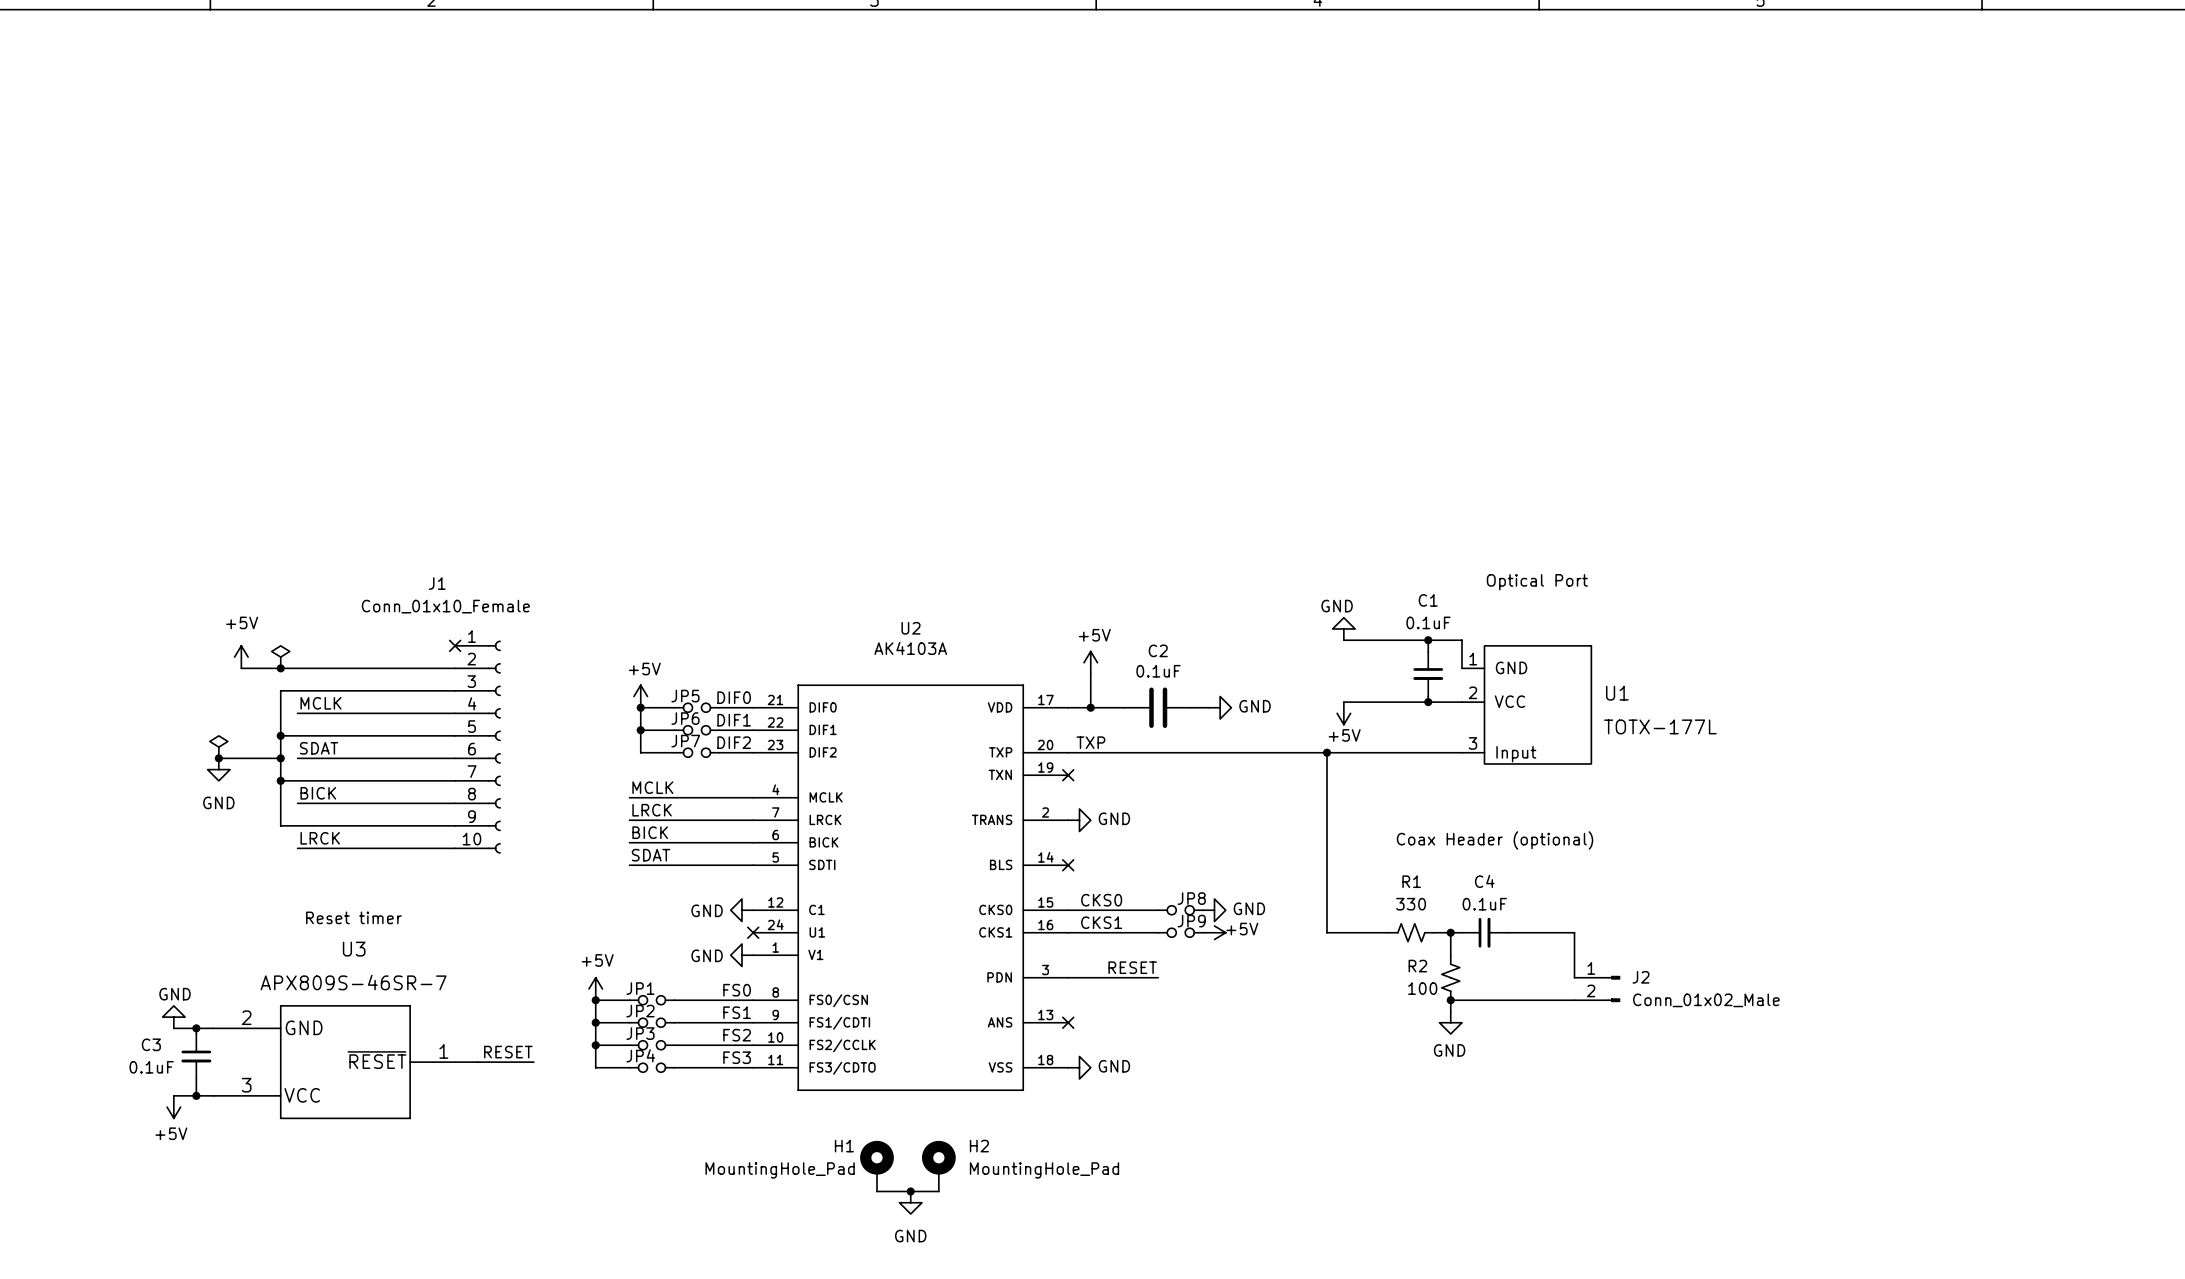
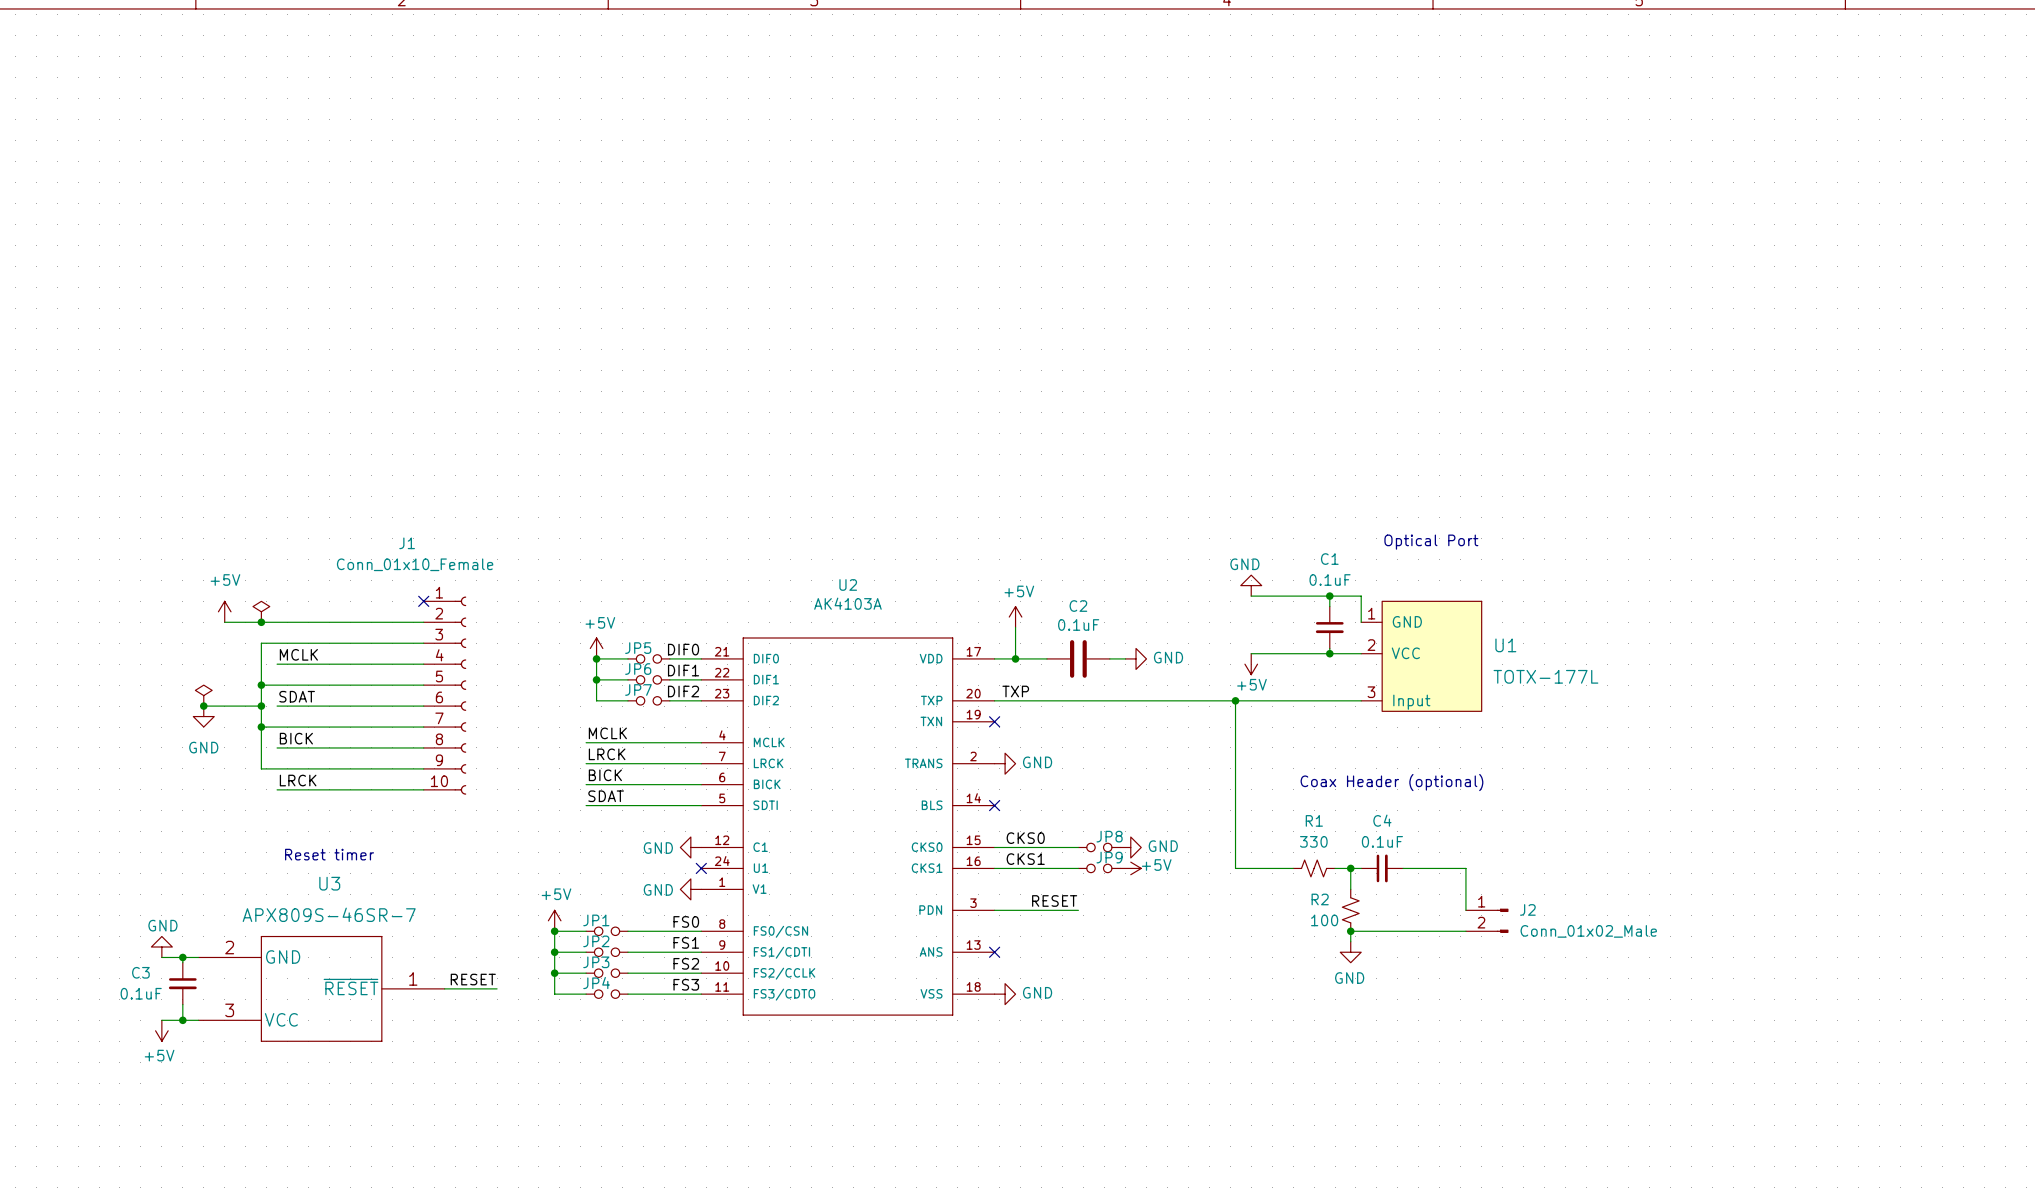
H1: MountingHole_Pad (876, 1166) -> none
H2: MountingHole_Pad (938, 1166) -> none
wire: (876, 1191) (938, 1191) -> none
junction: (910, 1191) -> none
power symbol: GND (910, 1202) -> none

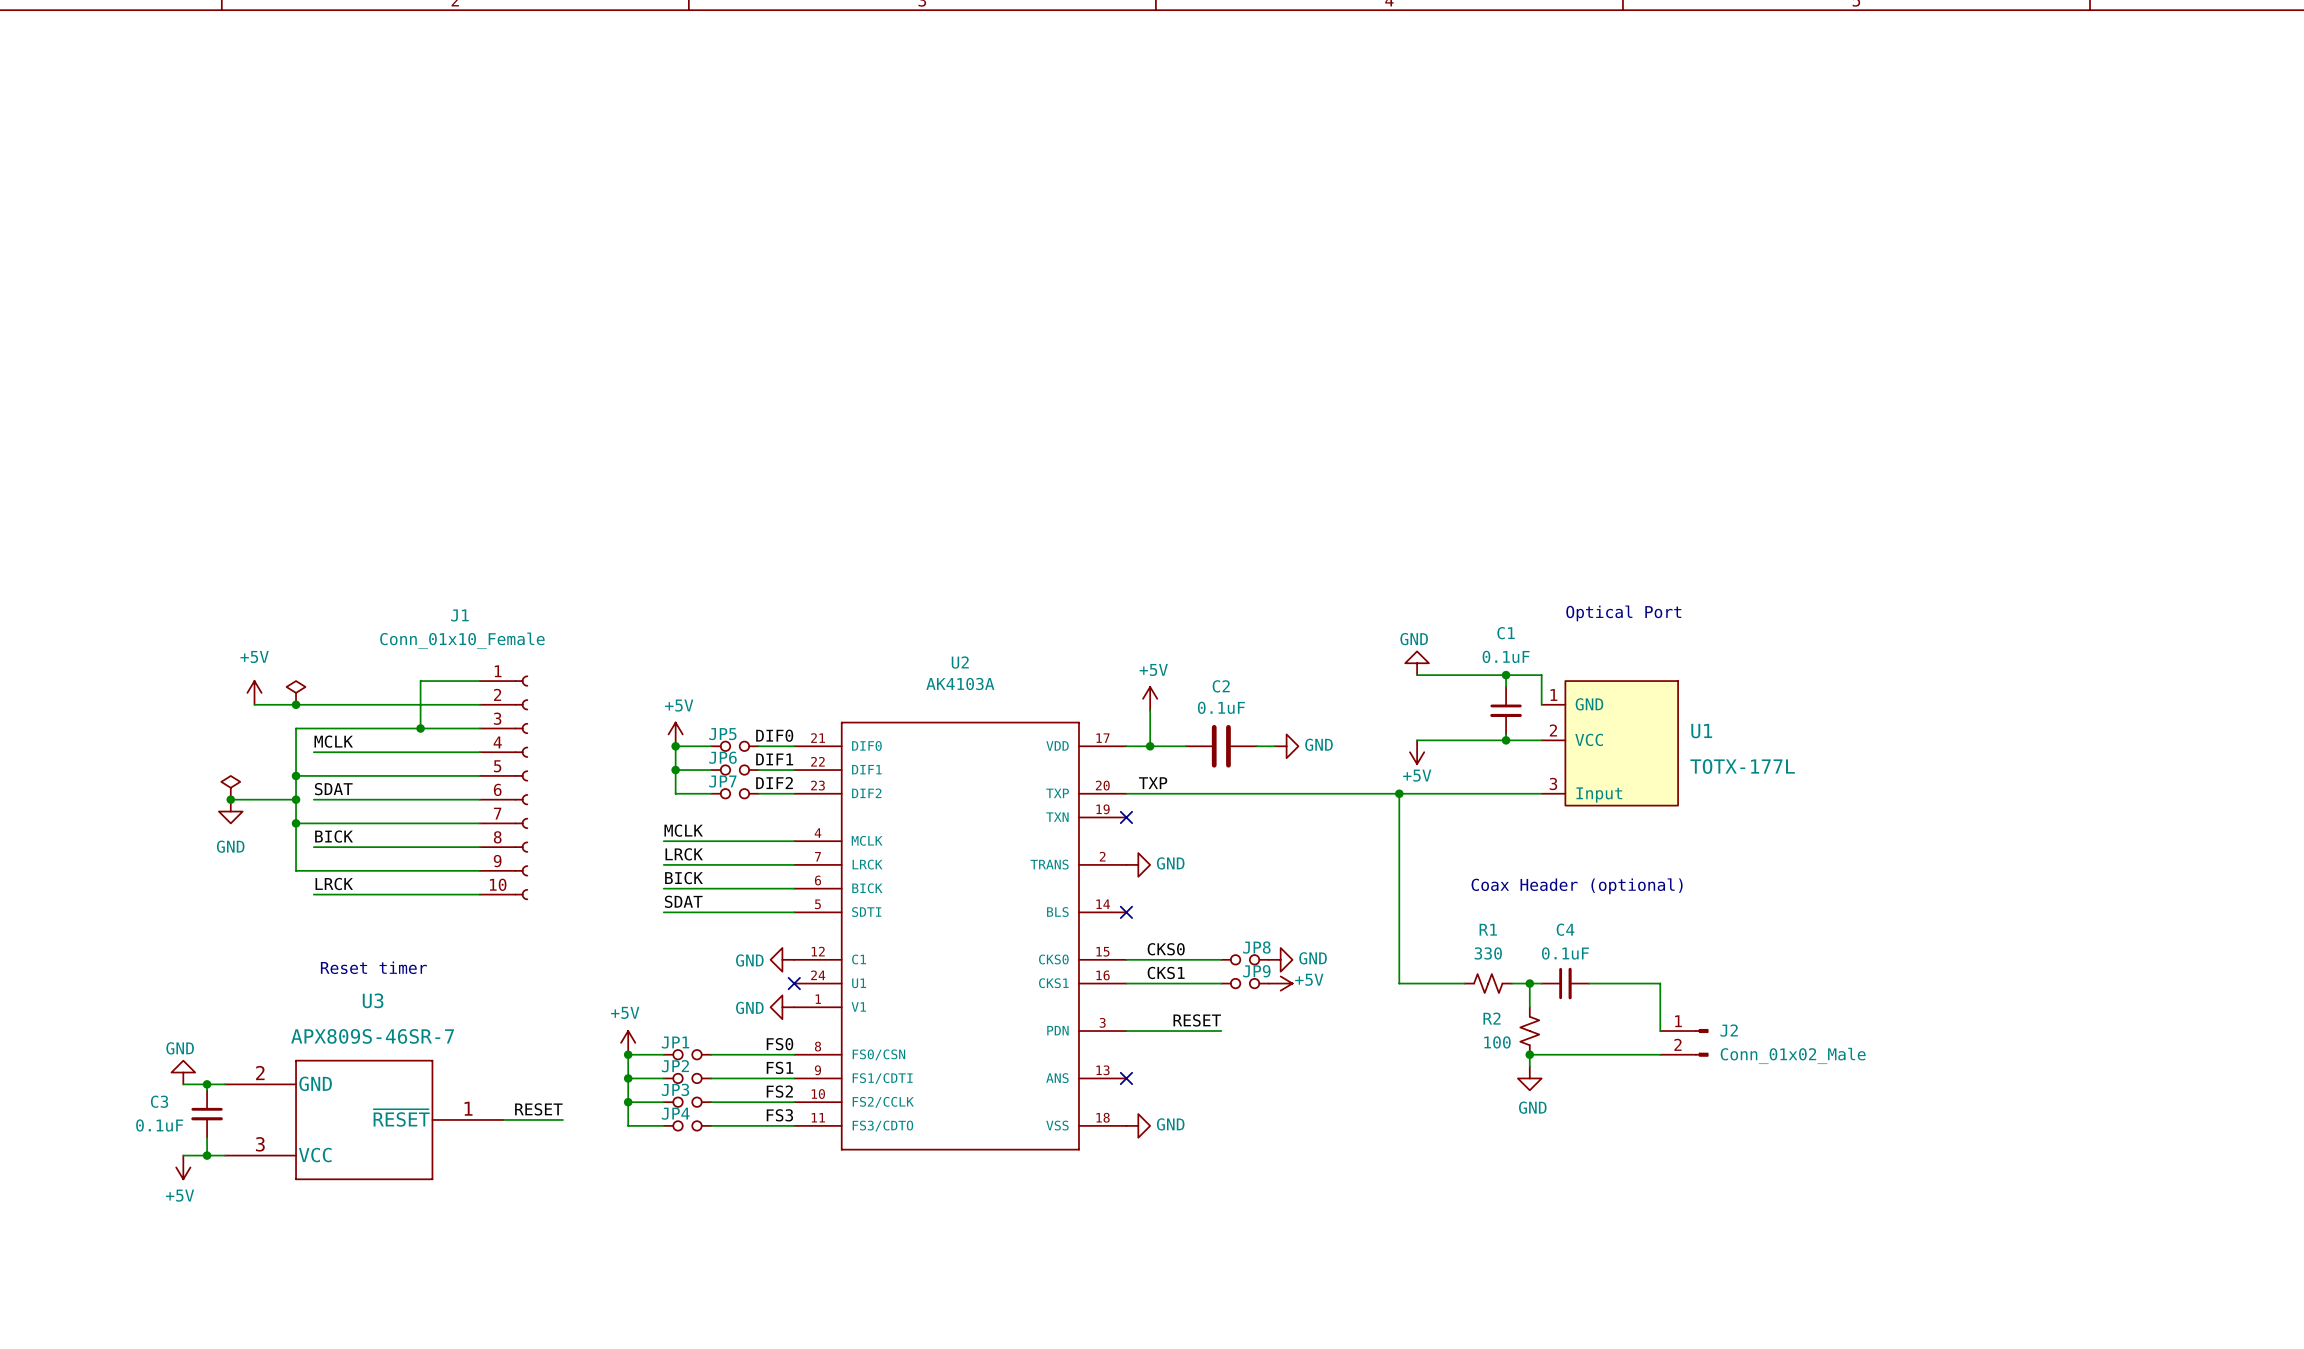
wire: none -> (479, 681) (420, 681) (420, 728)
no-connect mark: (423, 601) -> none
junction: none -> (420, 728)

